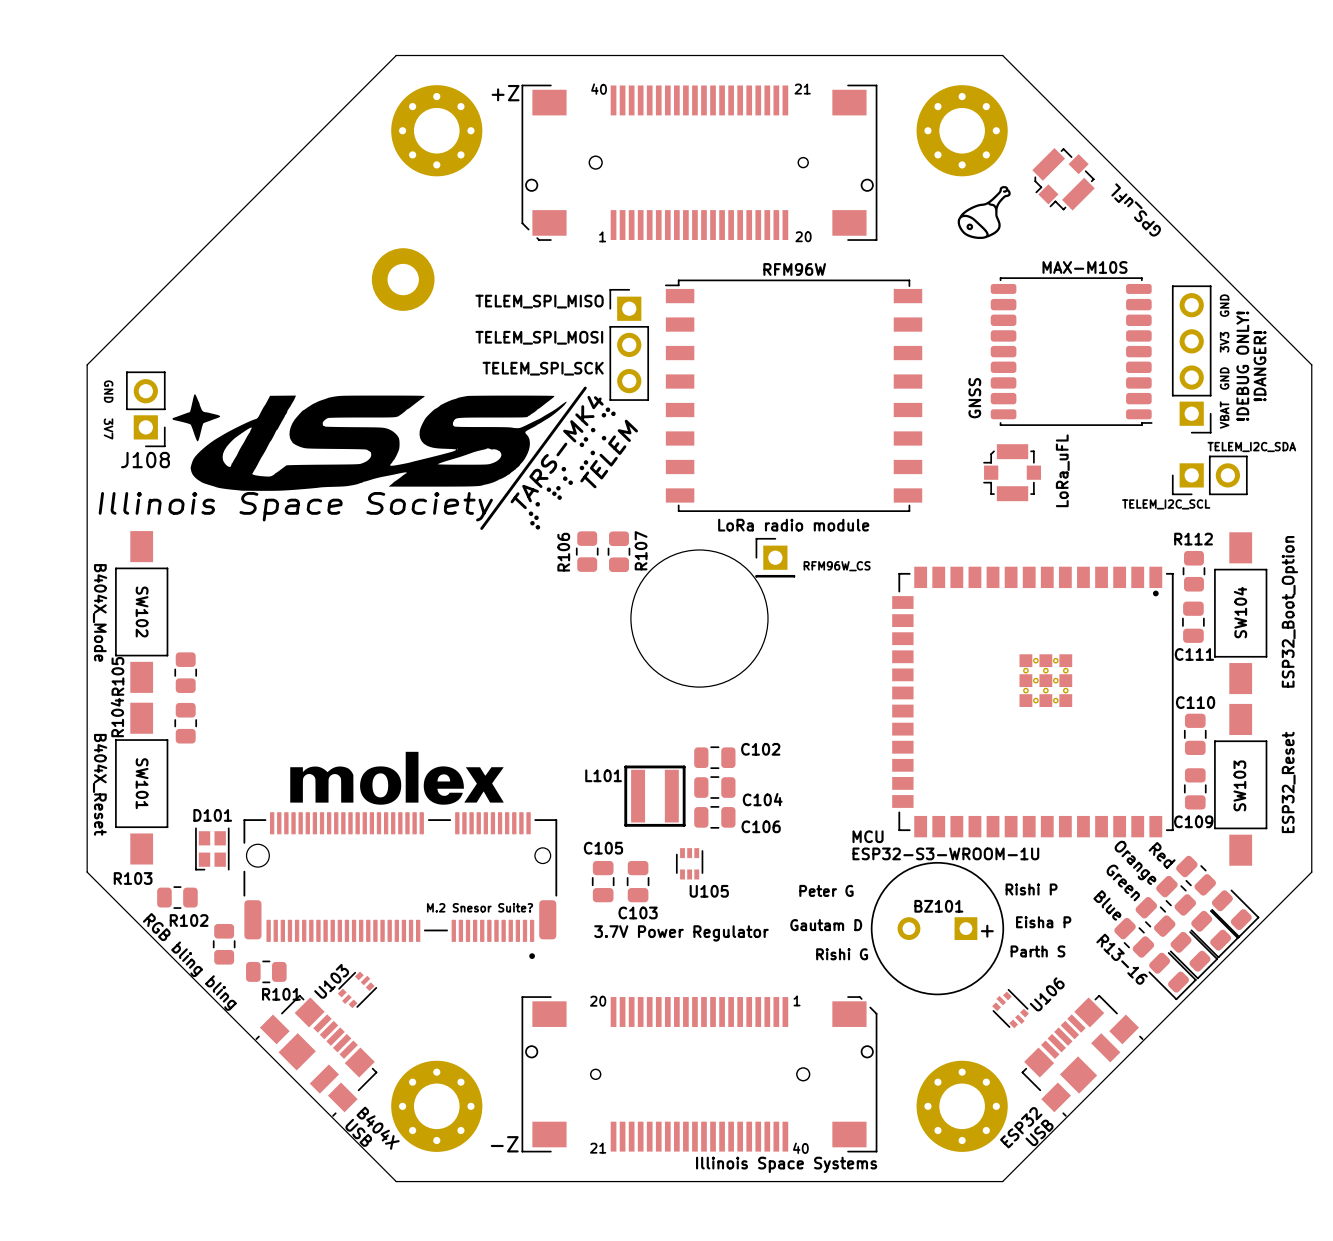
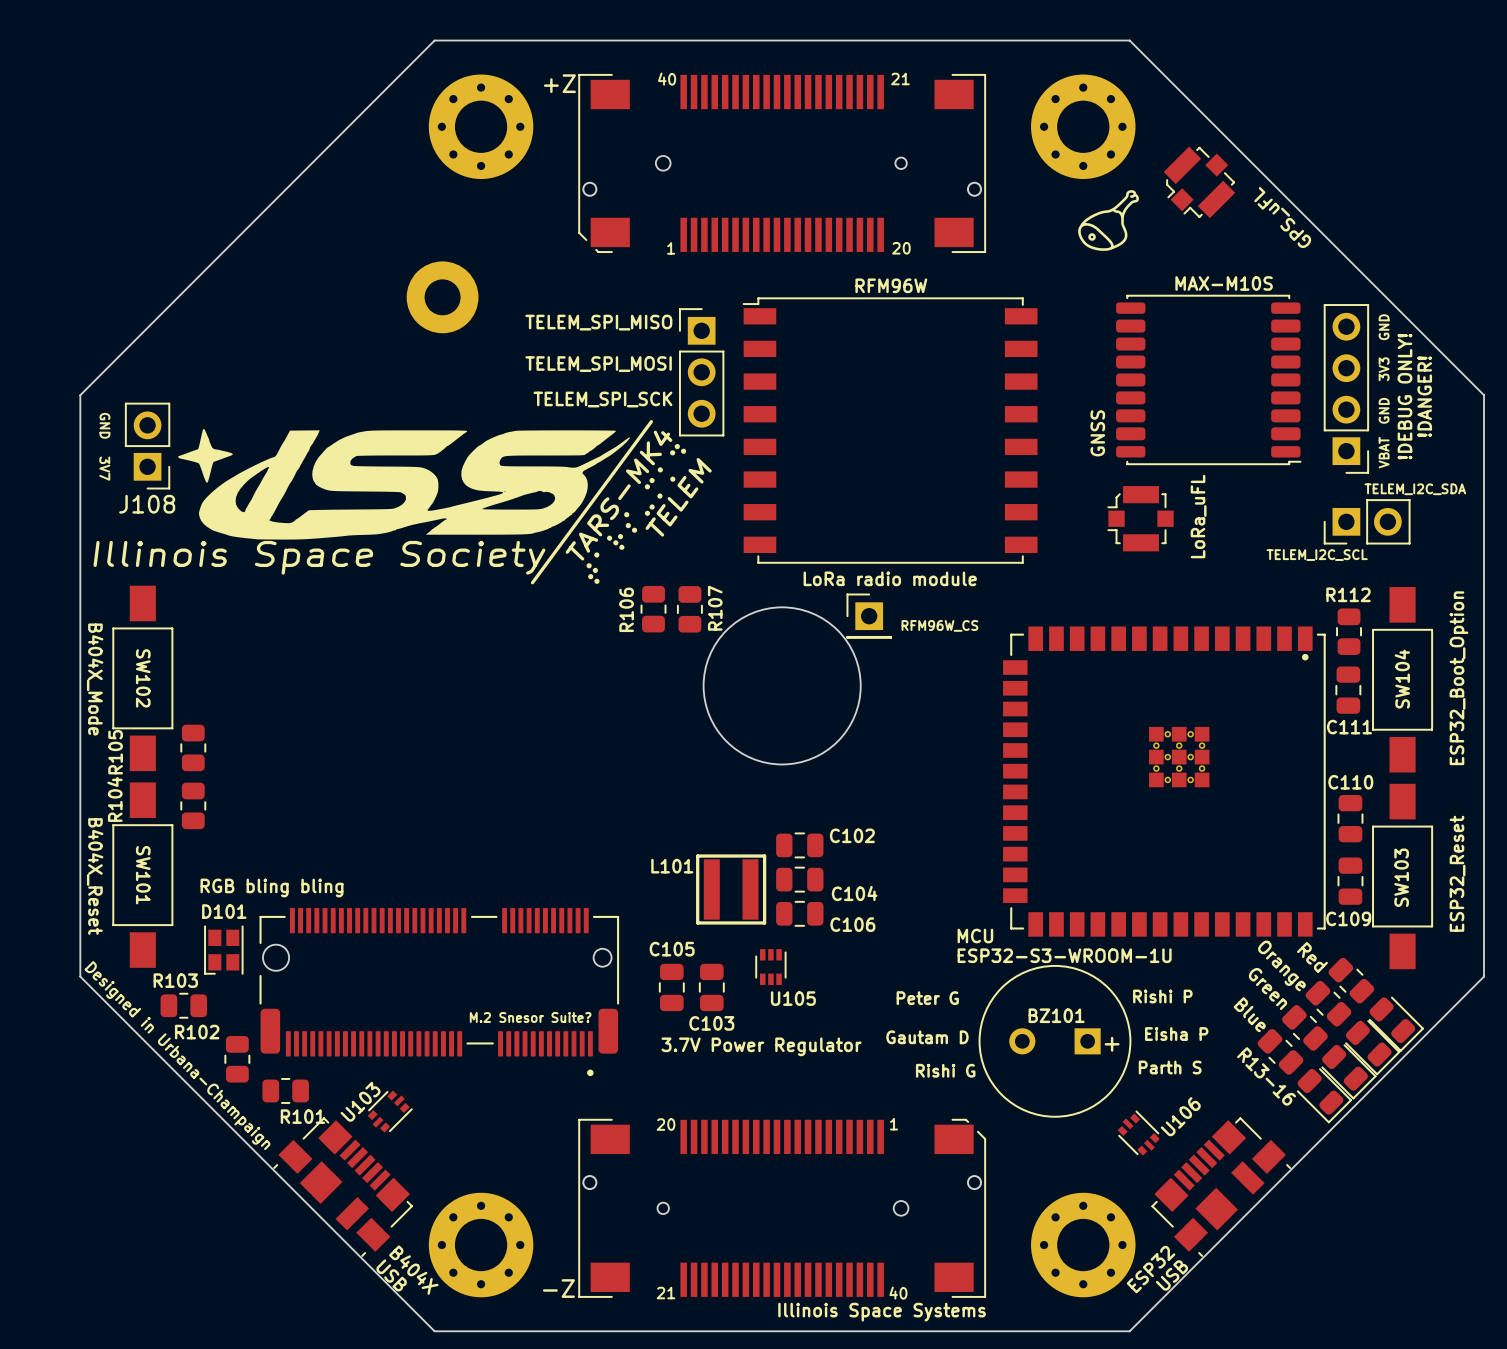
drawing: [290, 751, 504, 805] -> none
R103 name position: R103 (133, 878) -> R103 (175, 980)
text: none -> Designed in Urbana-Champaign (177, 1055)
text rotation: 0° (189, 961) -> 45° counterclockwise (271, 887)
text position: RGB bling bling (189, 961) -> RGB bling bling (271, 887)

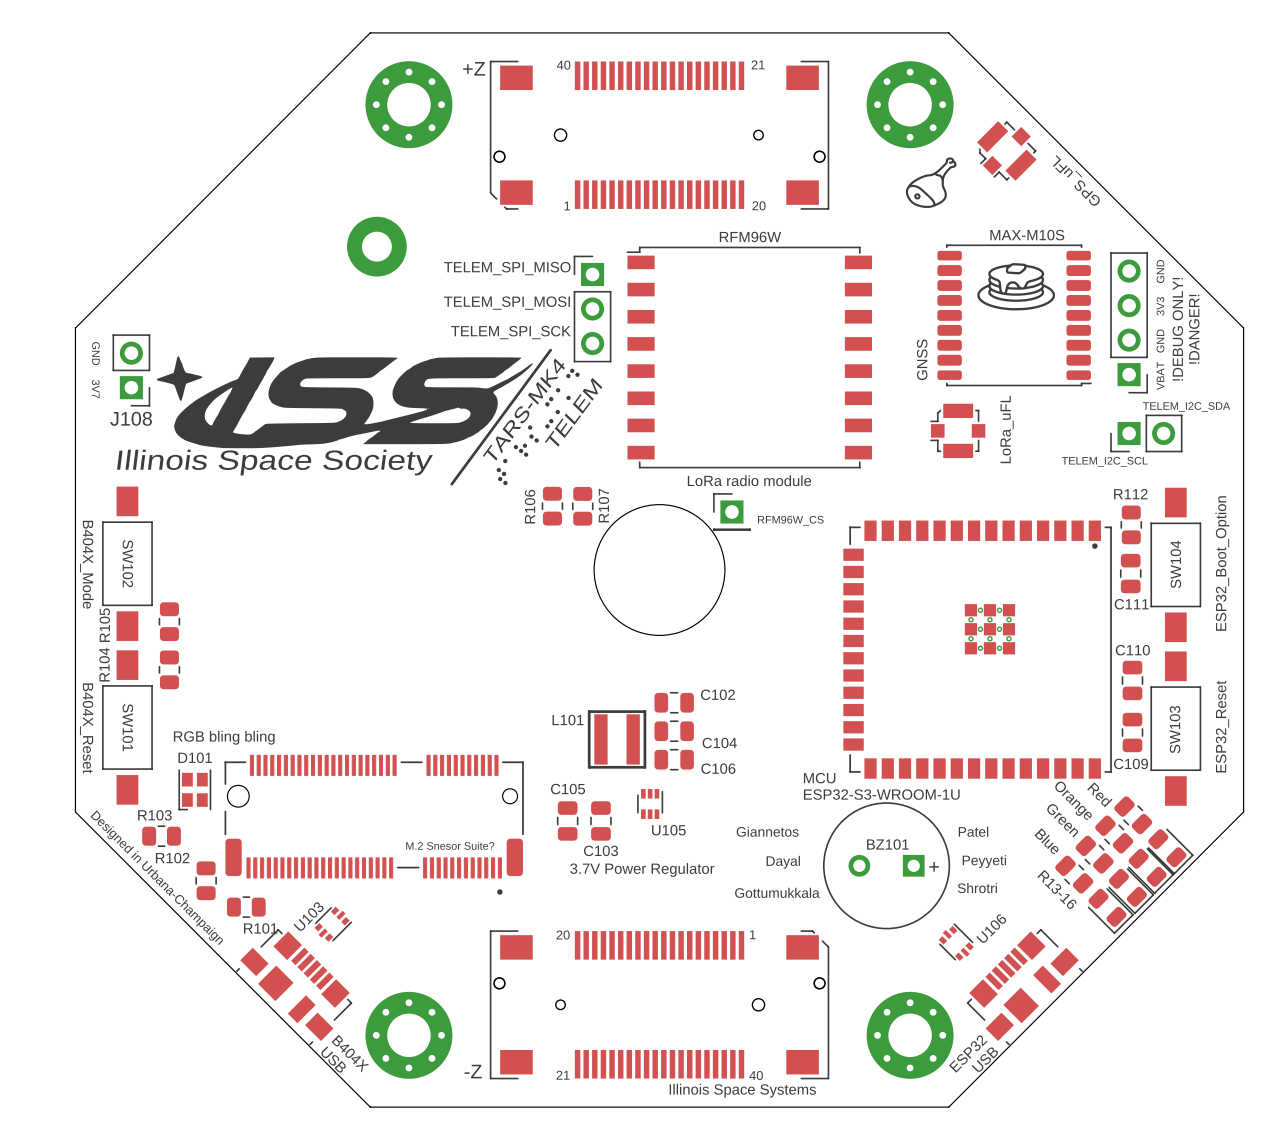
drawing: none -> [977, 263, 1055, 311]
text: Rishi P (1162, 996) -> Patel (973, 831)
text: Peter G (927, 998) -> Giannetos (767, 831)
text: Eisha P (1176, 1034) -> Peyyeti (984, 861)
text: Gautam D (927, 1037) -> Dayal (783, 862)
text: Parth S (1170, 1067) -> Shrotri (977, 888)
text: Rishi G (945, 1070) -> none
text: none -> Gottumukkala (777, 892)

